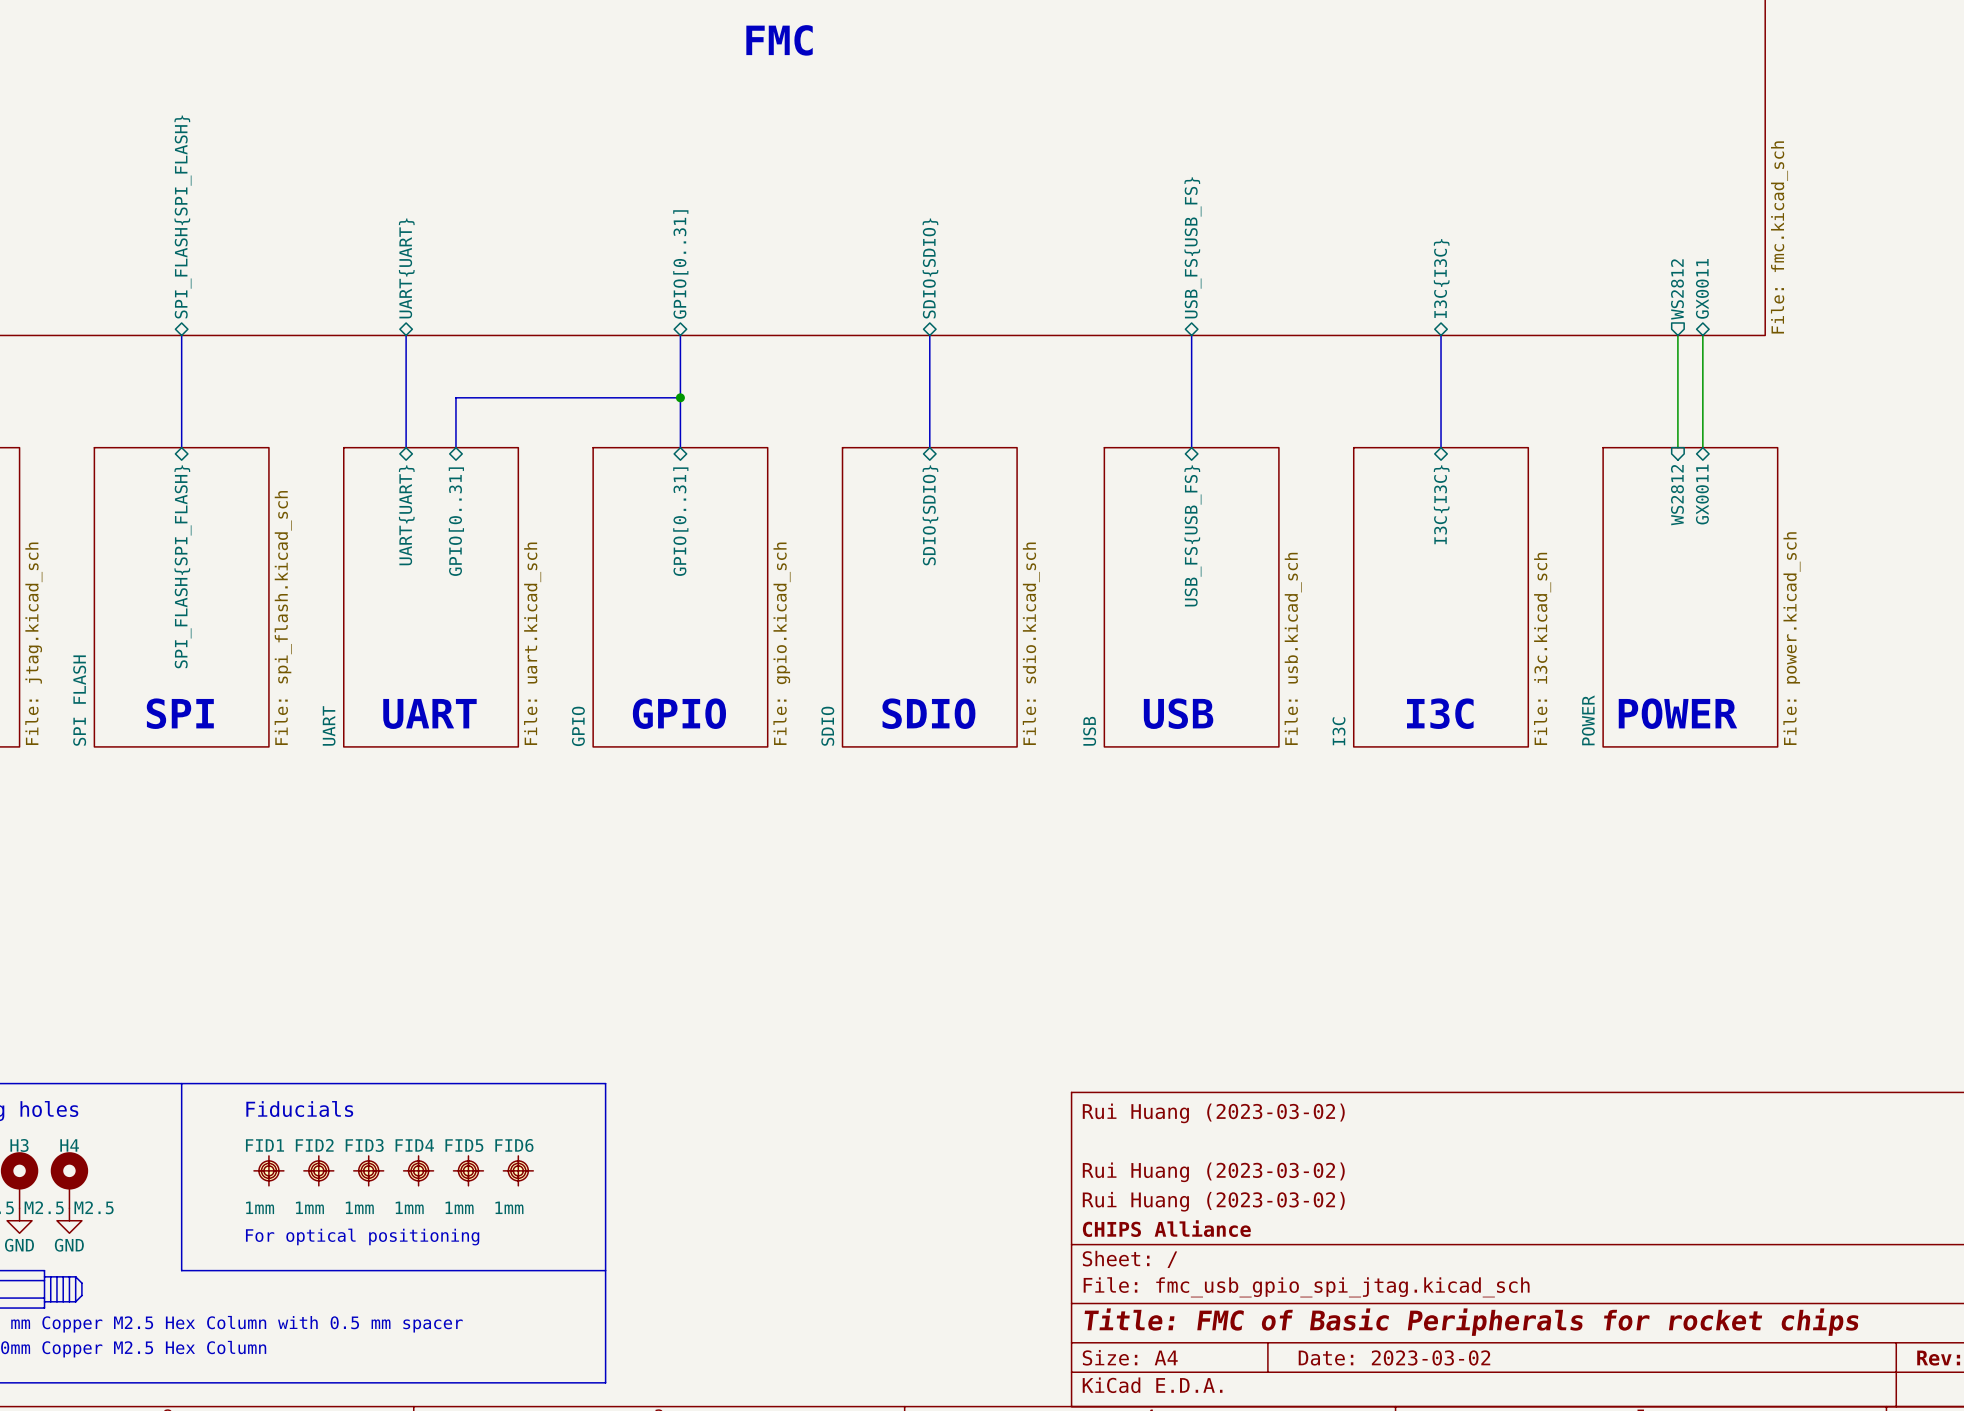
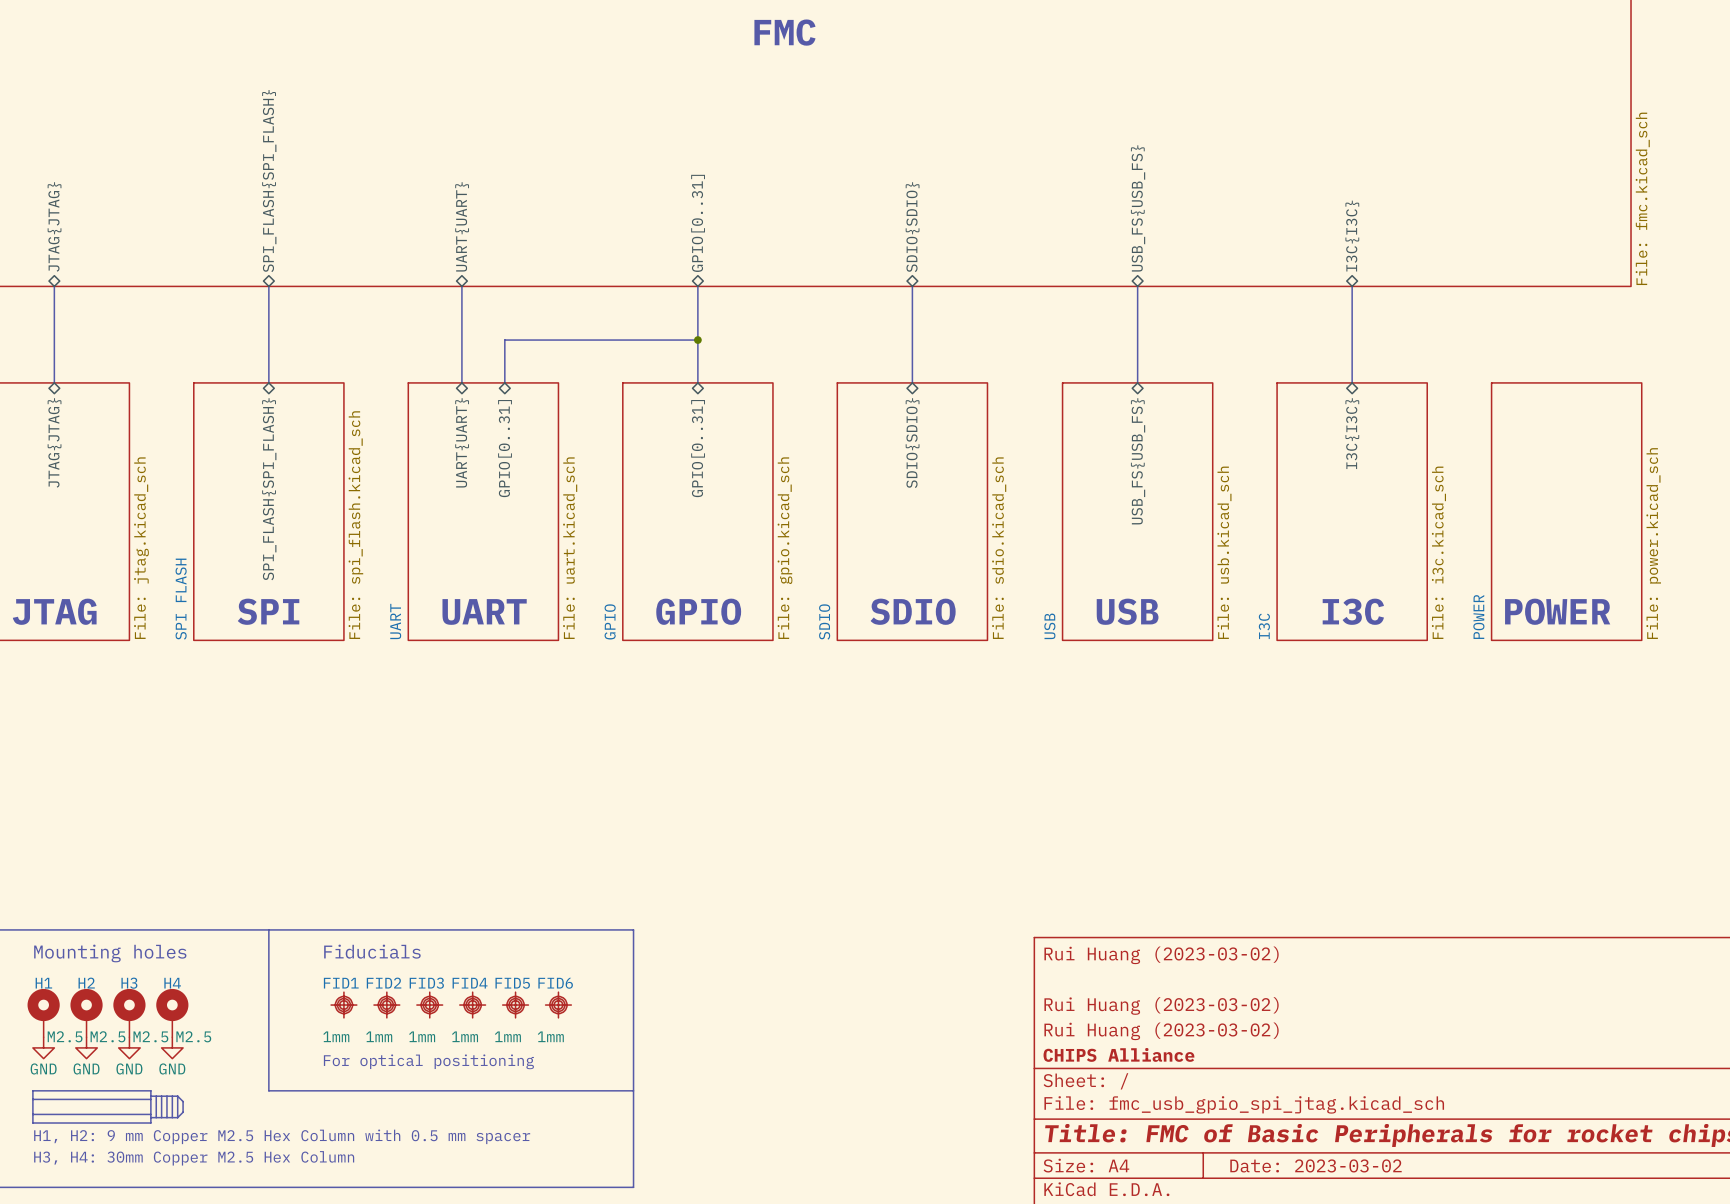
sheet pin: GX0011 (1702, 288) -> none
sheet pin: WS2812 (1677, 289) -> none
wire: (1677, 335) (1677, 447) -> none
wire: (1702, 335) (1702, 447) -> none
sheet pin: GX0011 (1702, 494) -> none
sheet pin: WS2812 (1677, 495) -> none

